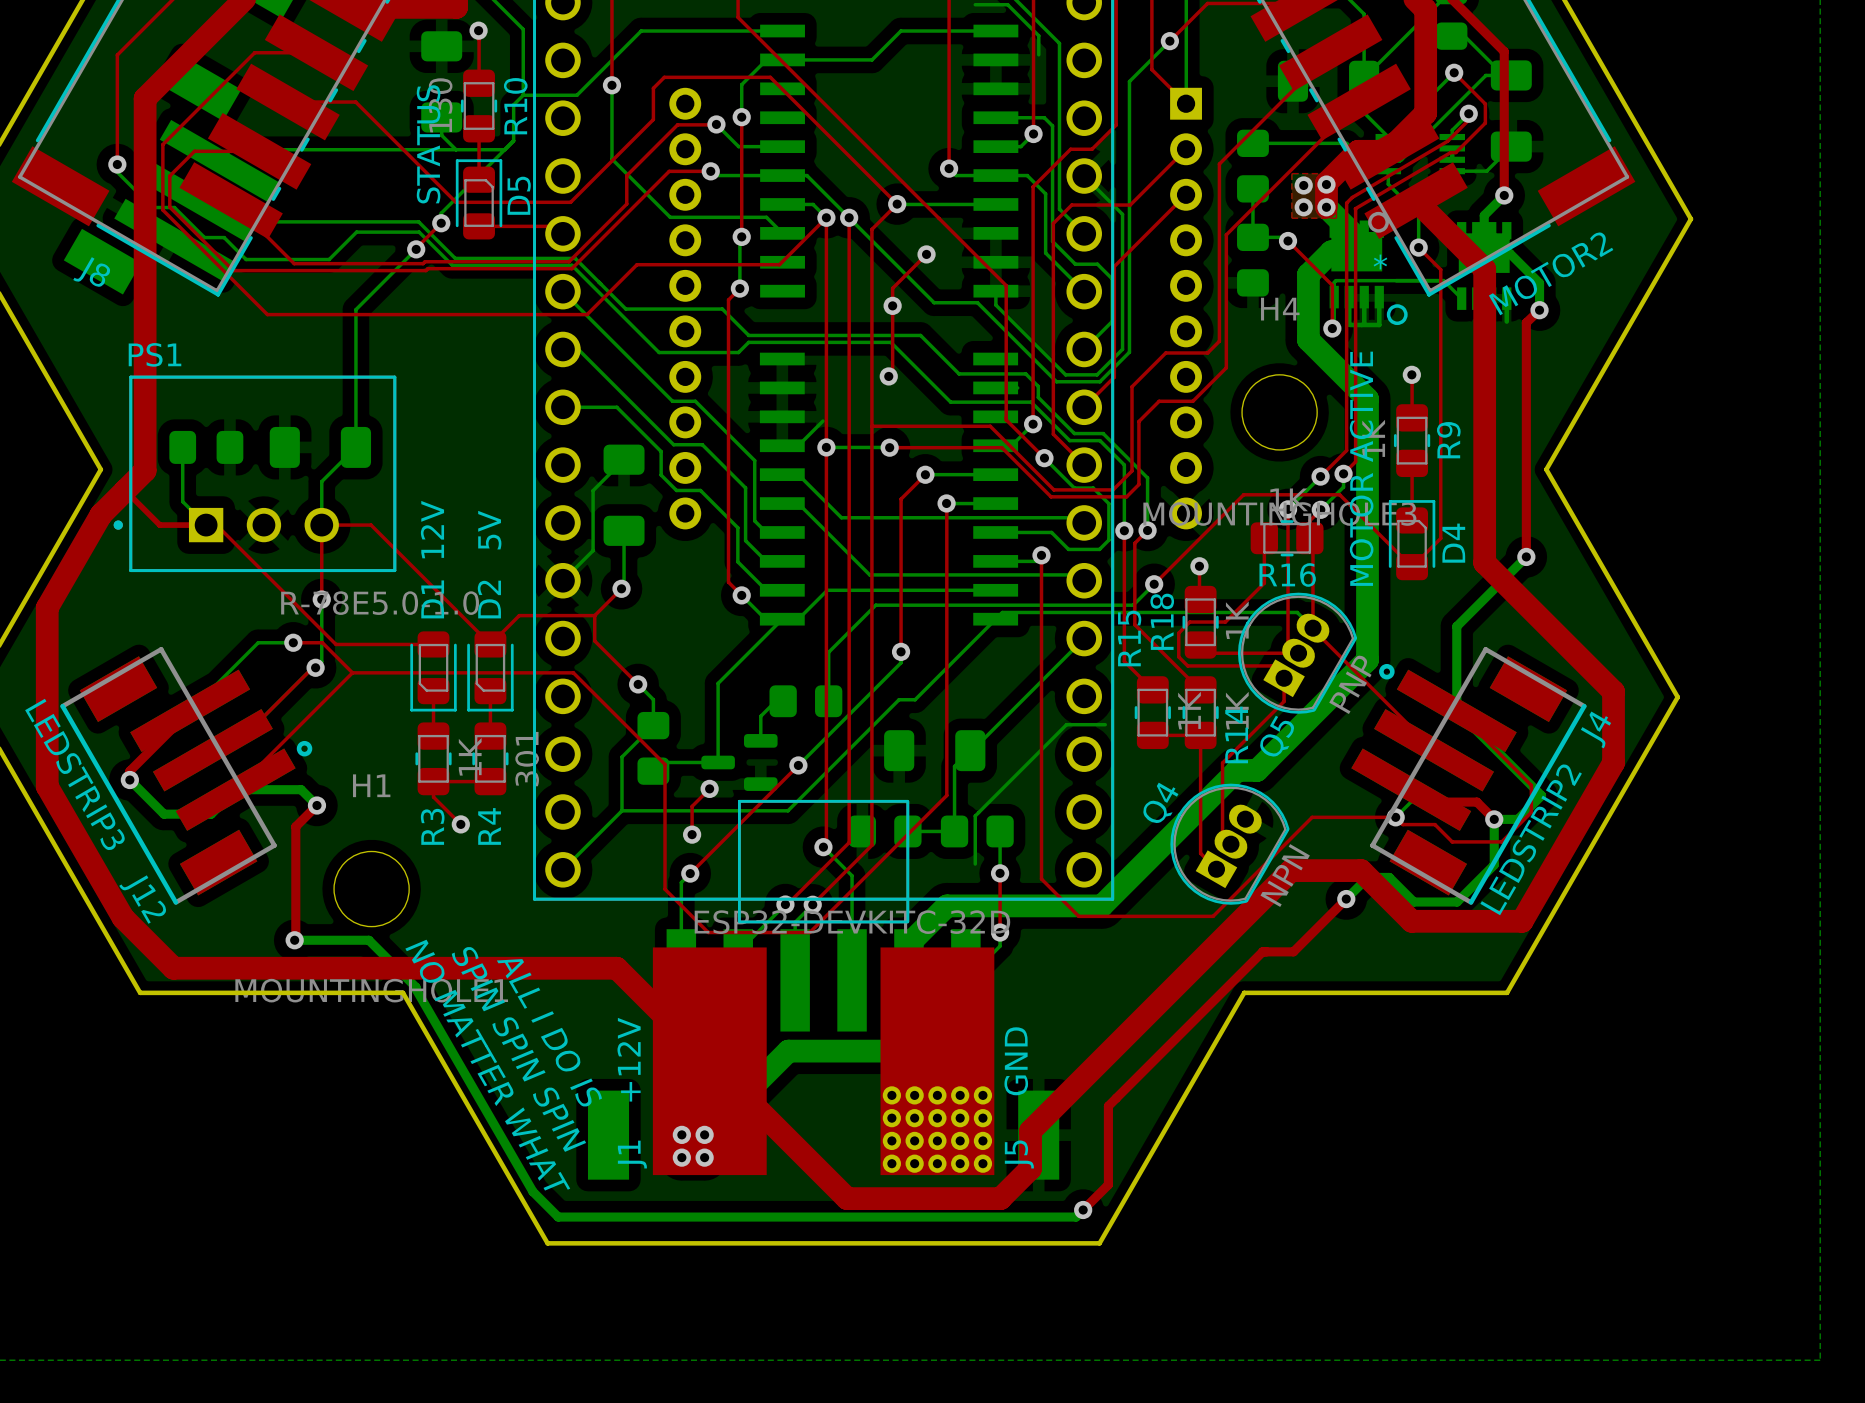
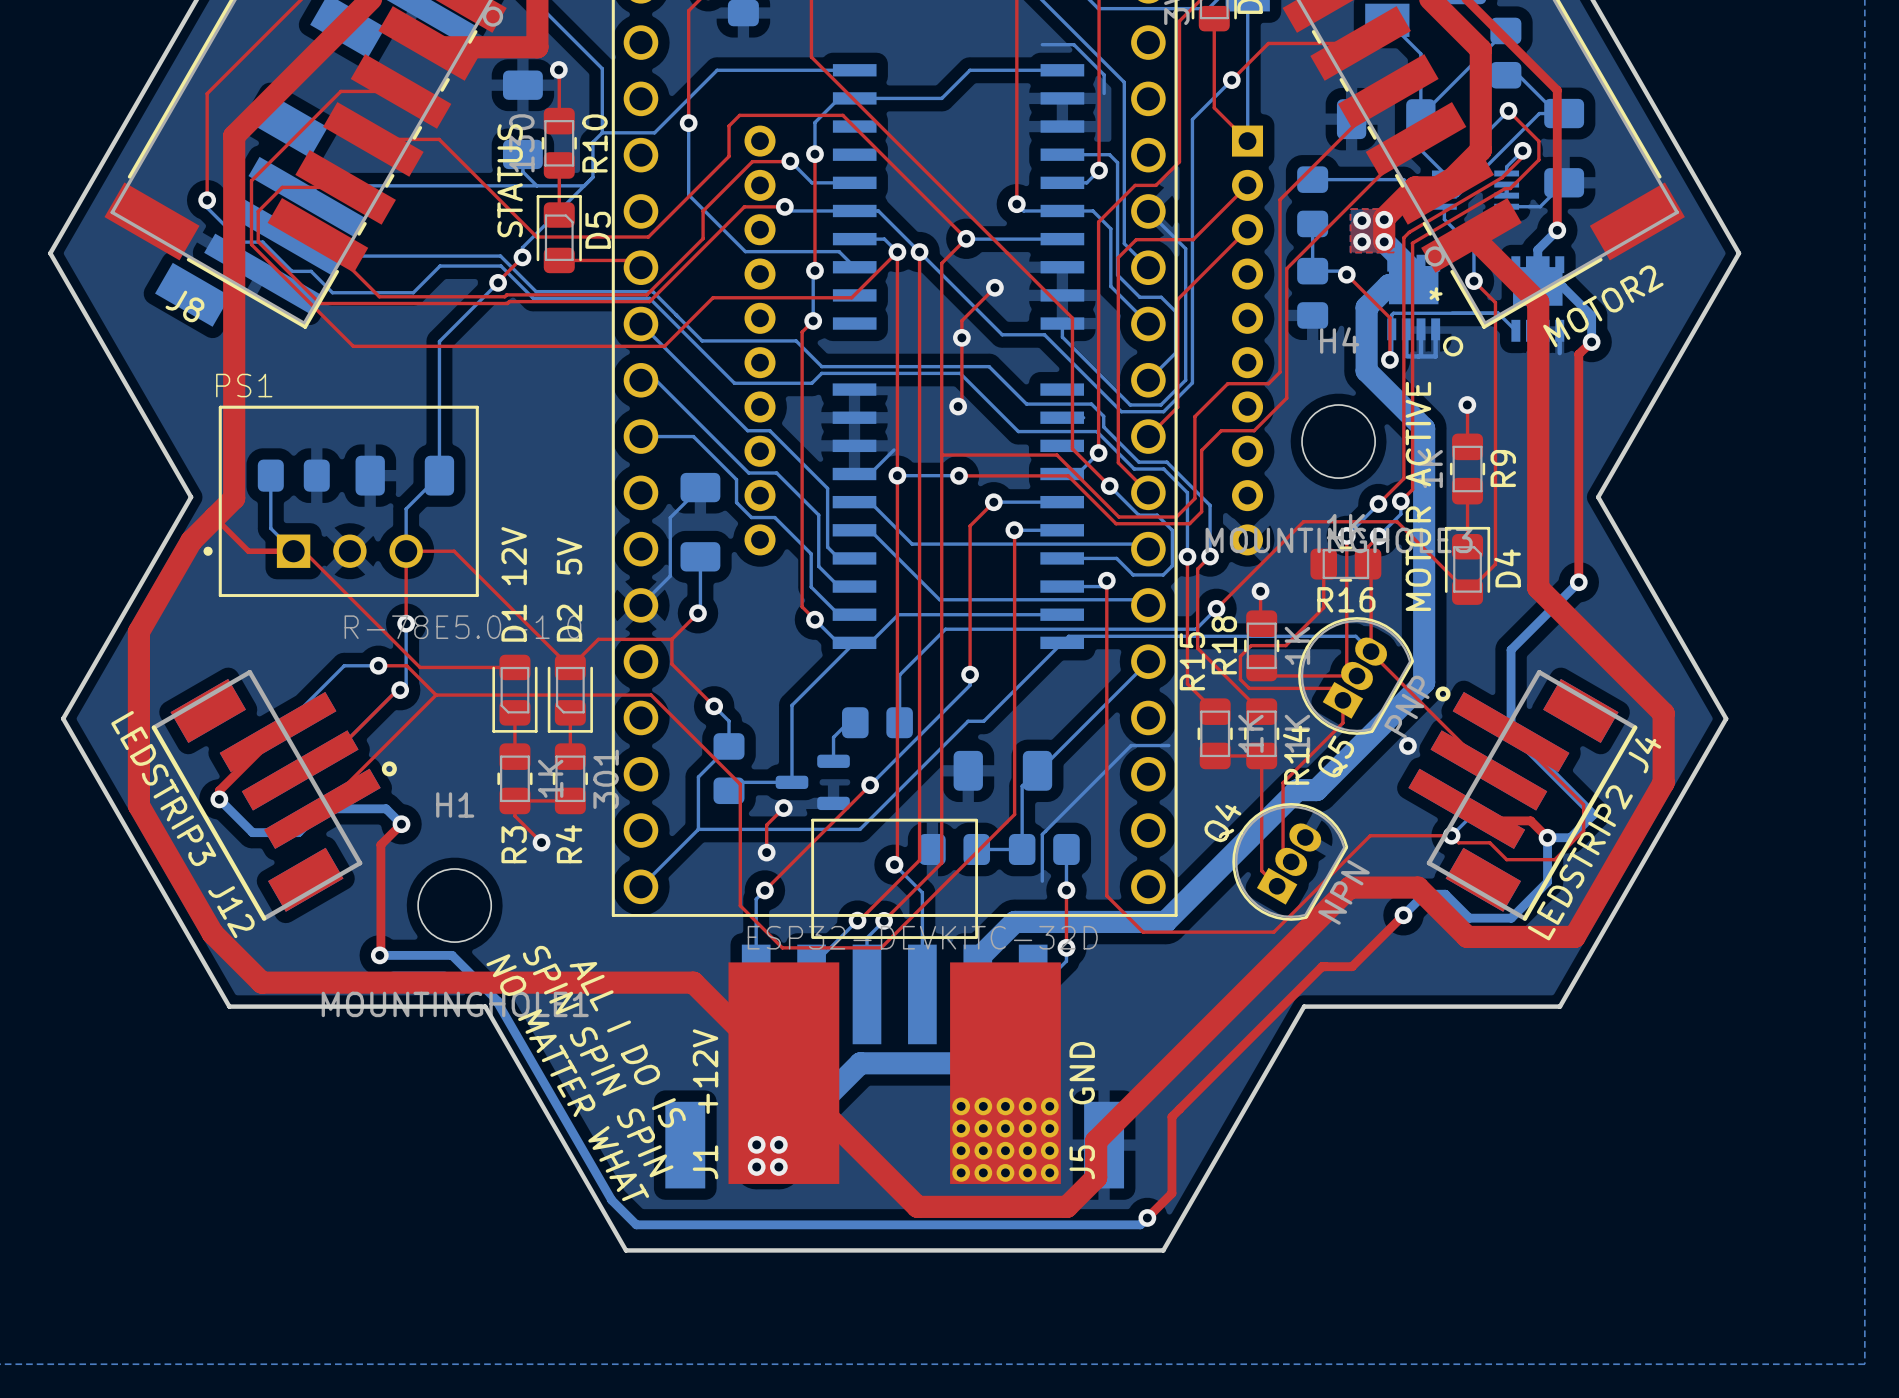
via: none -> (1407, 746)

